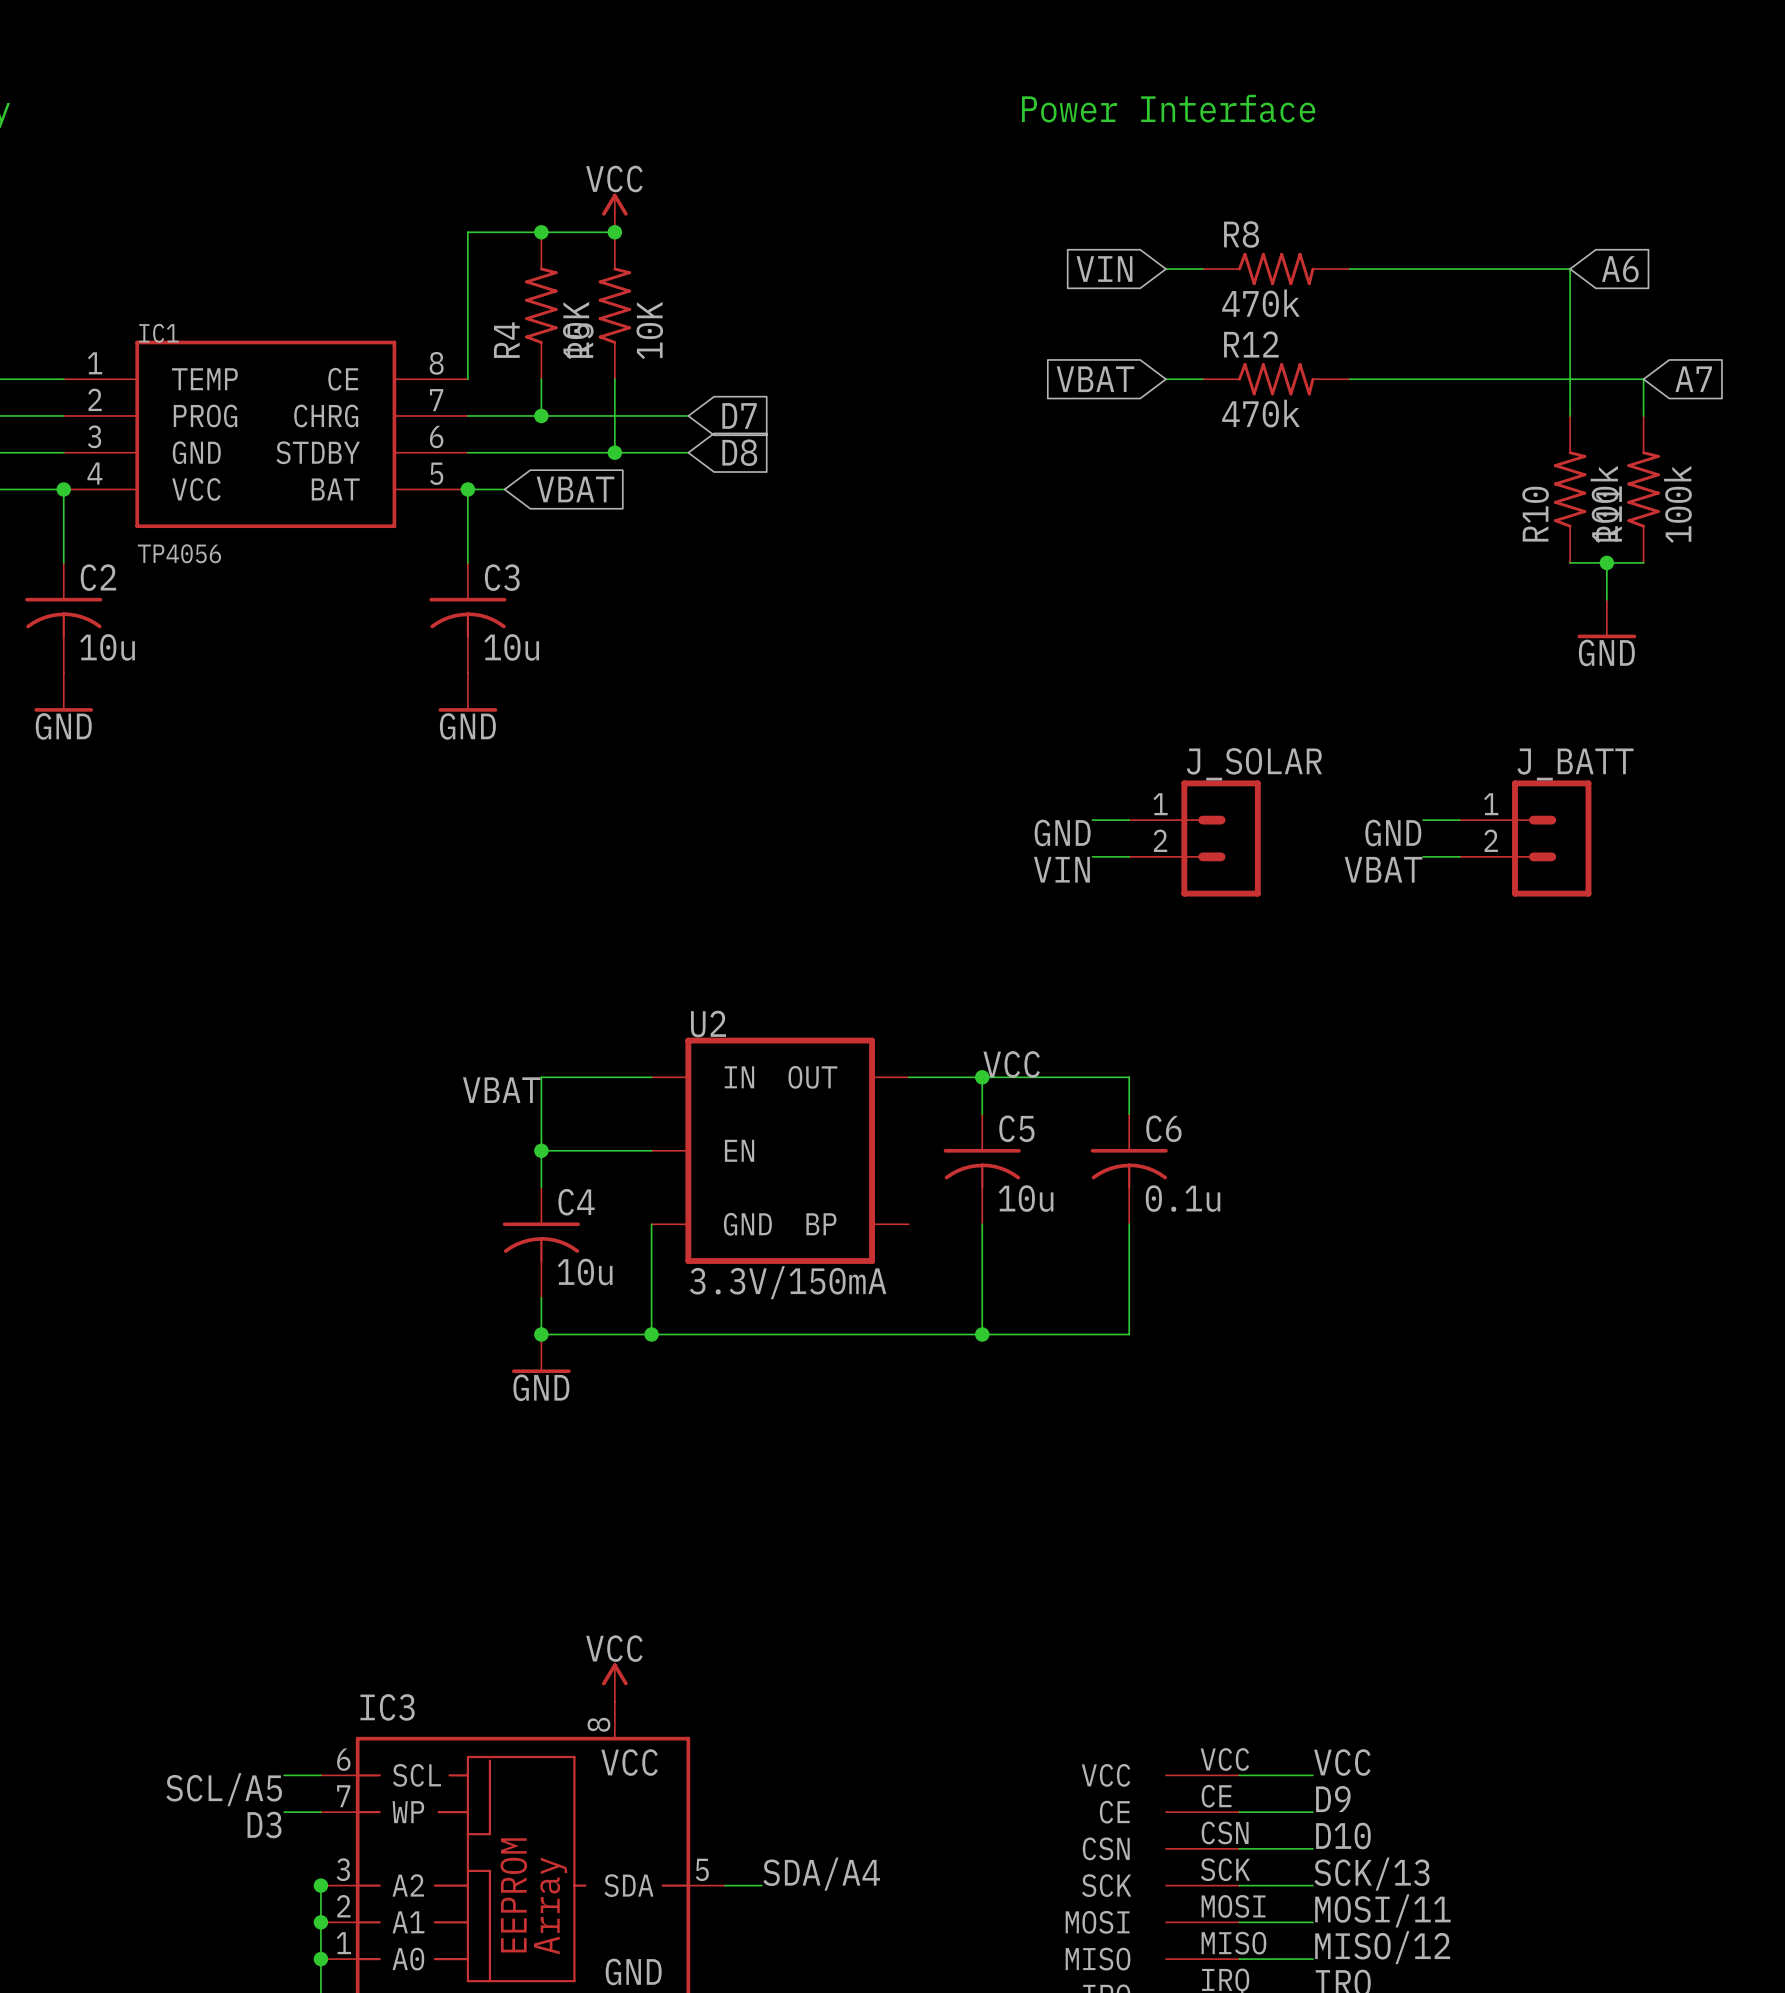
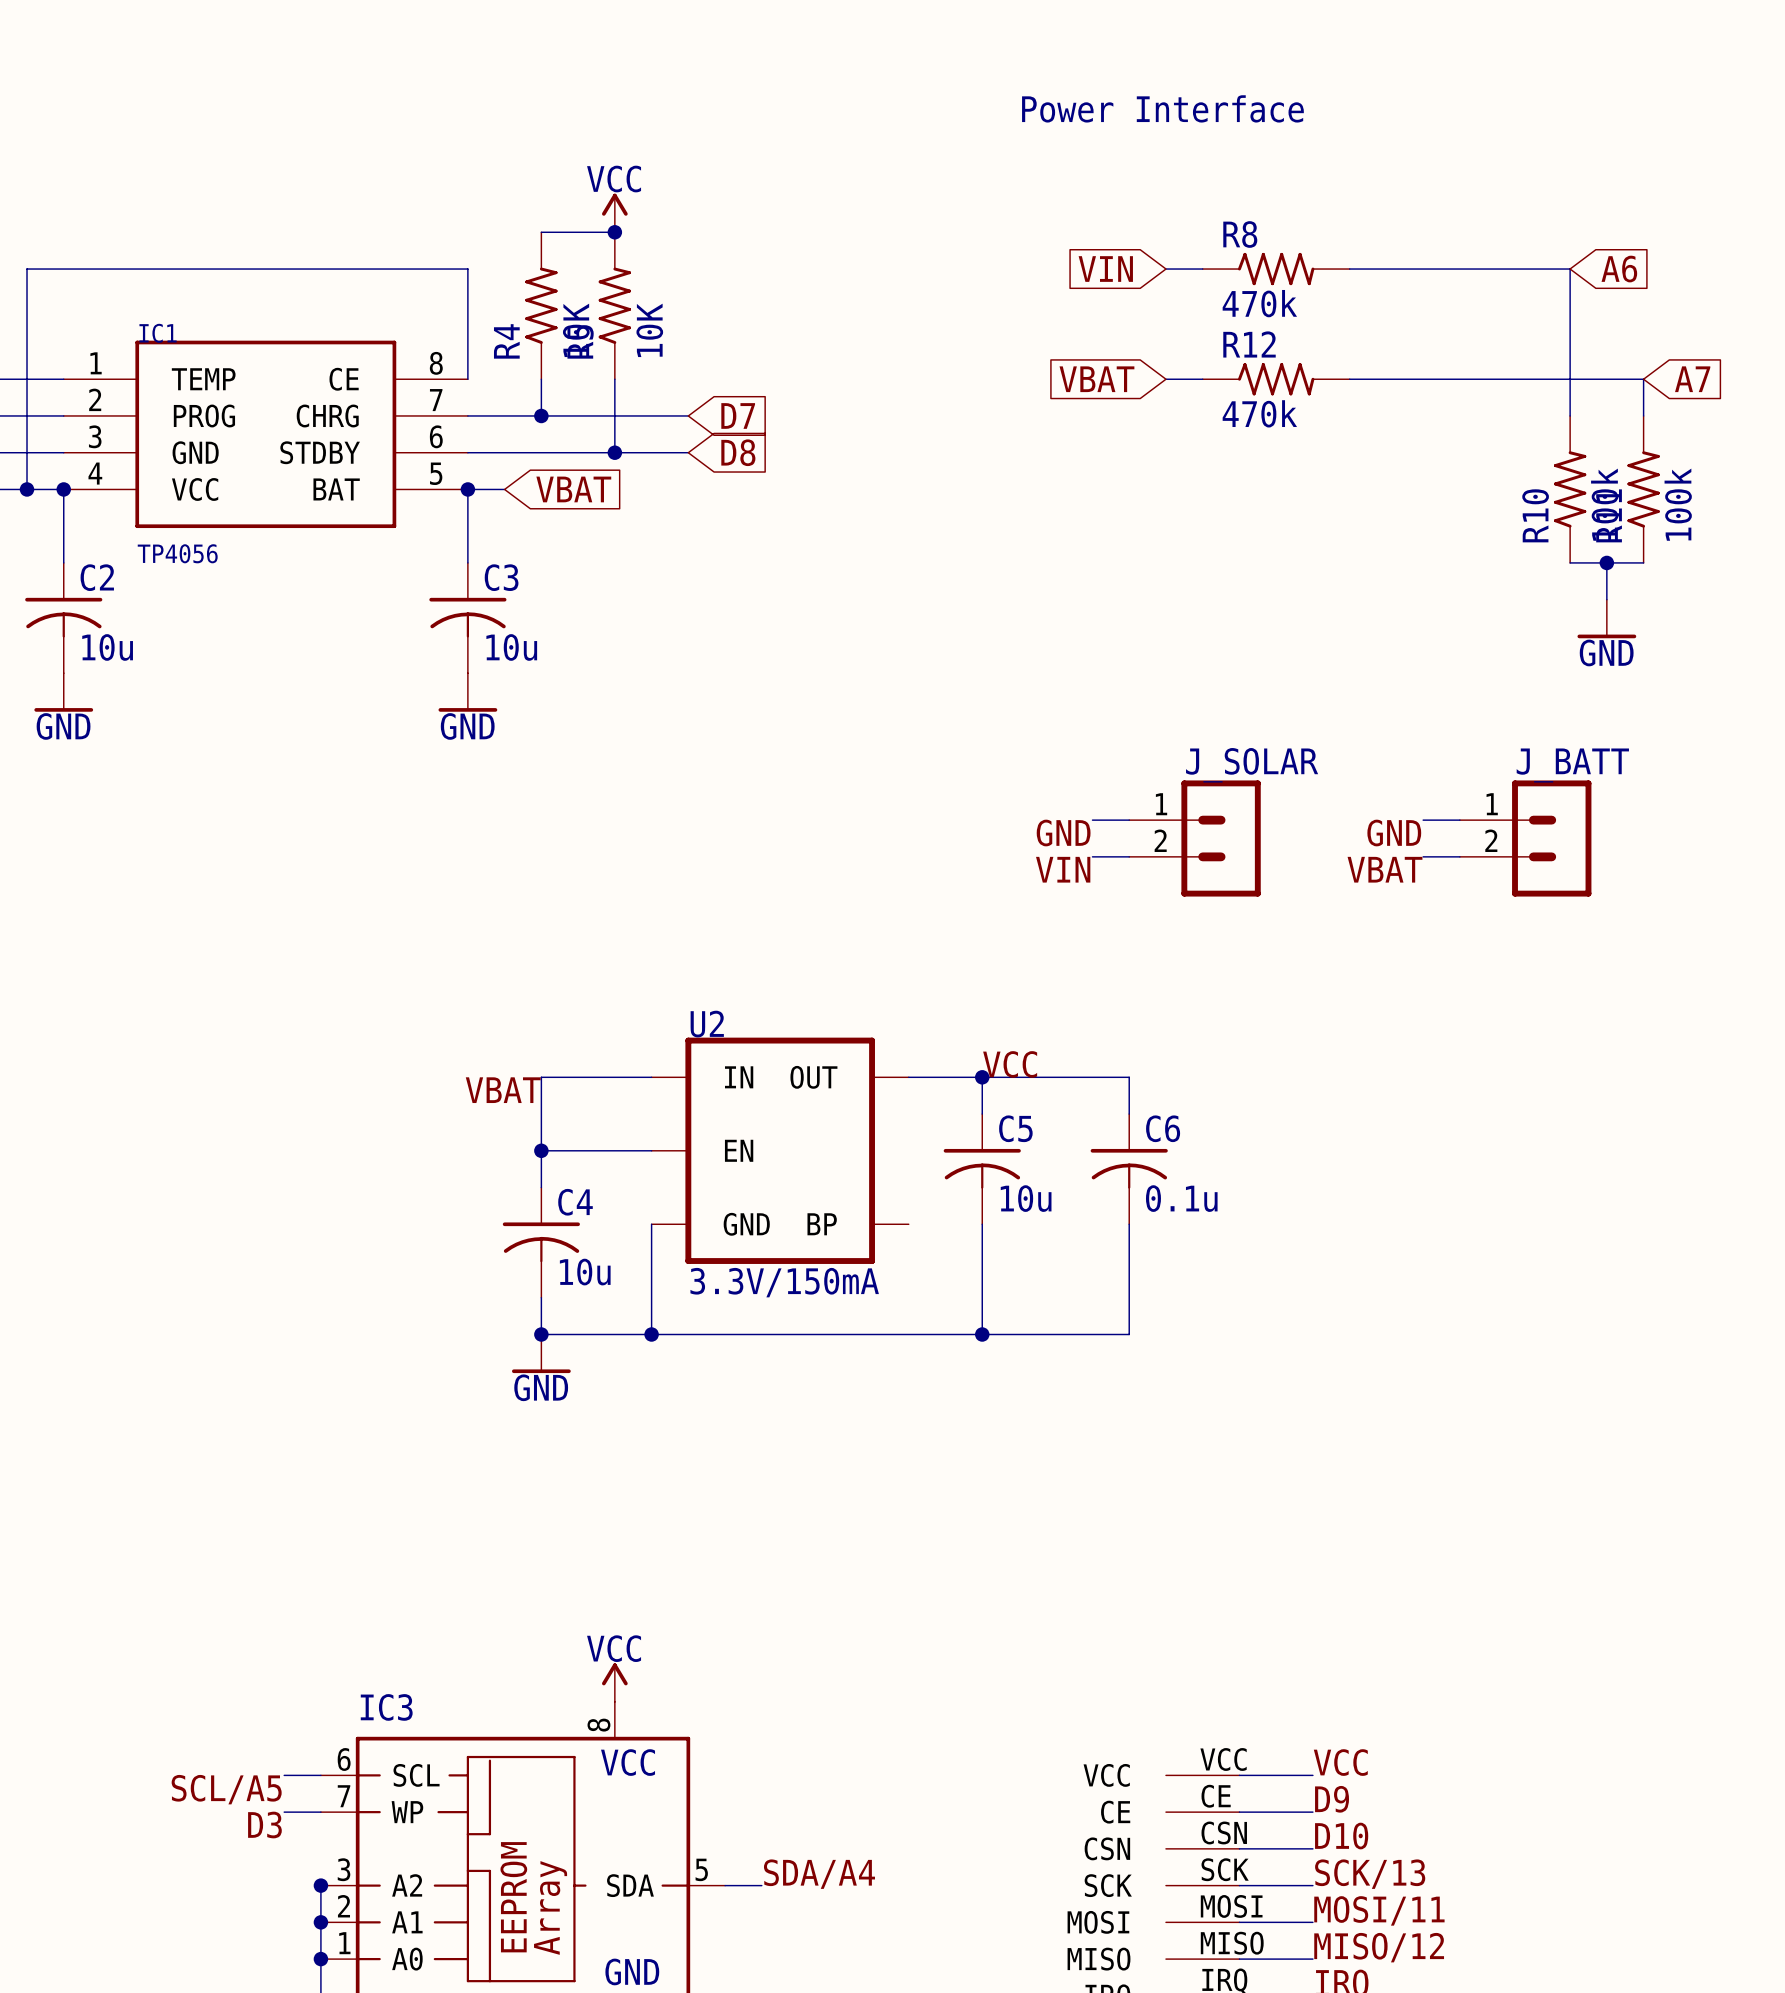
wire: (541, 232) (467, 232) (467, 269) -> (27, 489) (27, 269) (467, 269)
junction: (541, 232) -> none
junction: none -> (27, 489)

